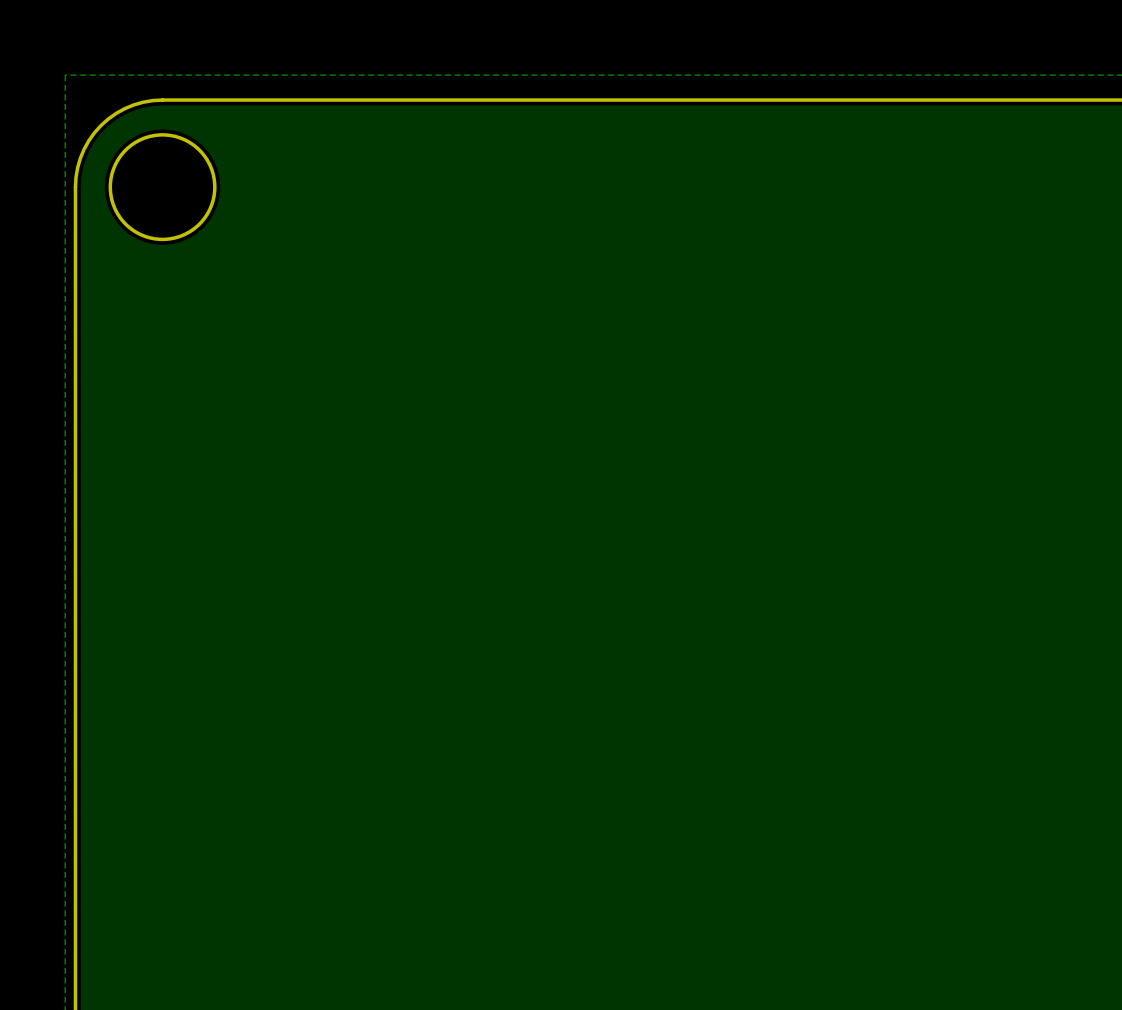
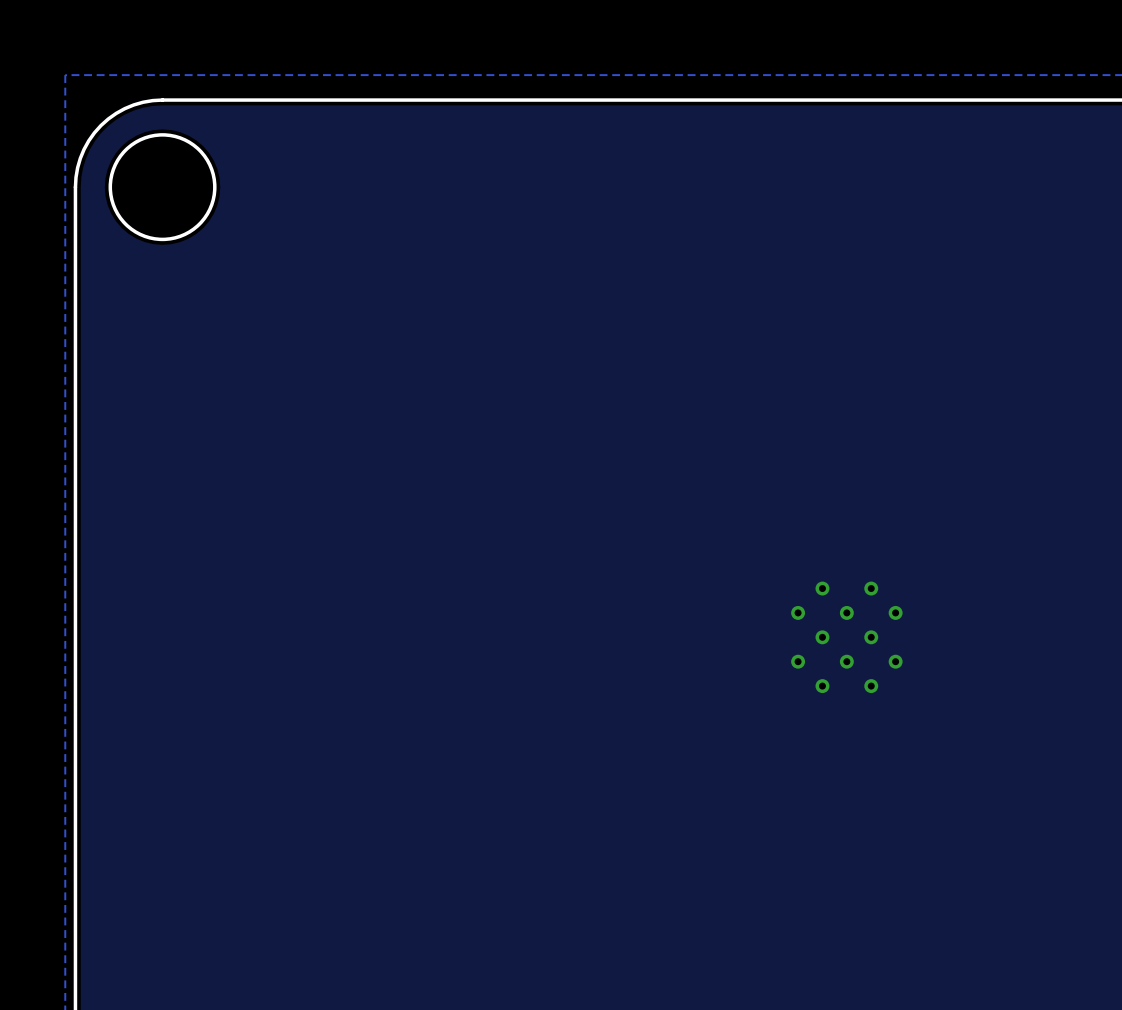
part: none -> (846, 637)

